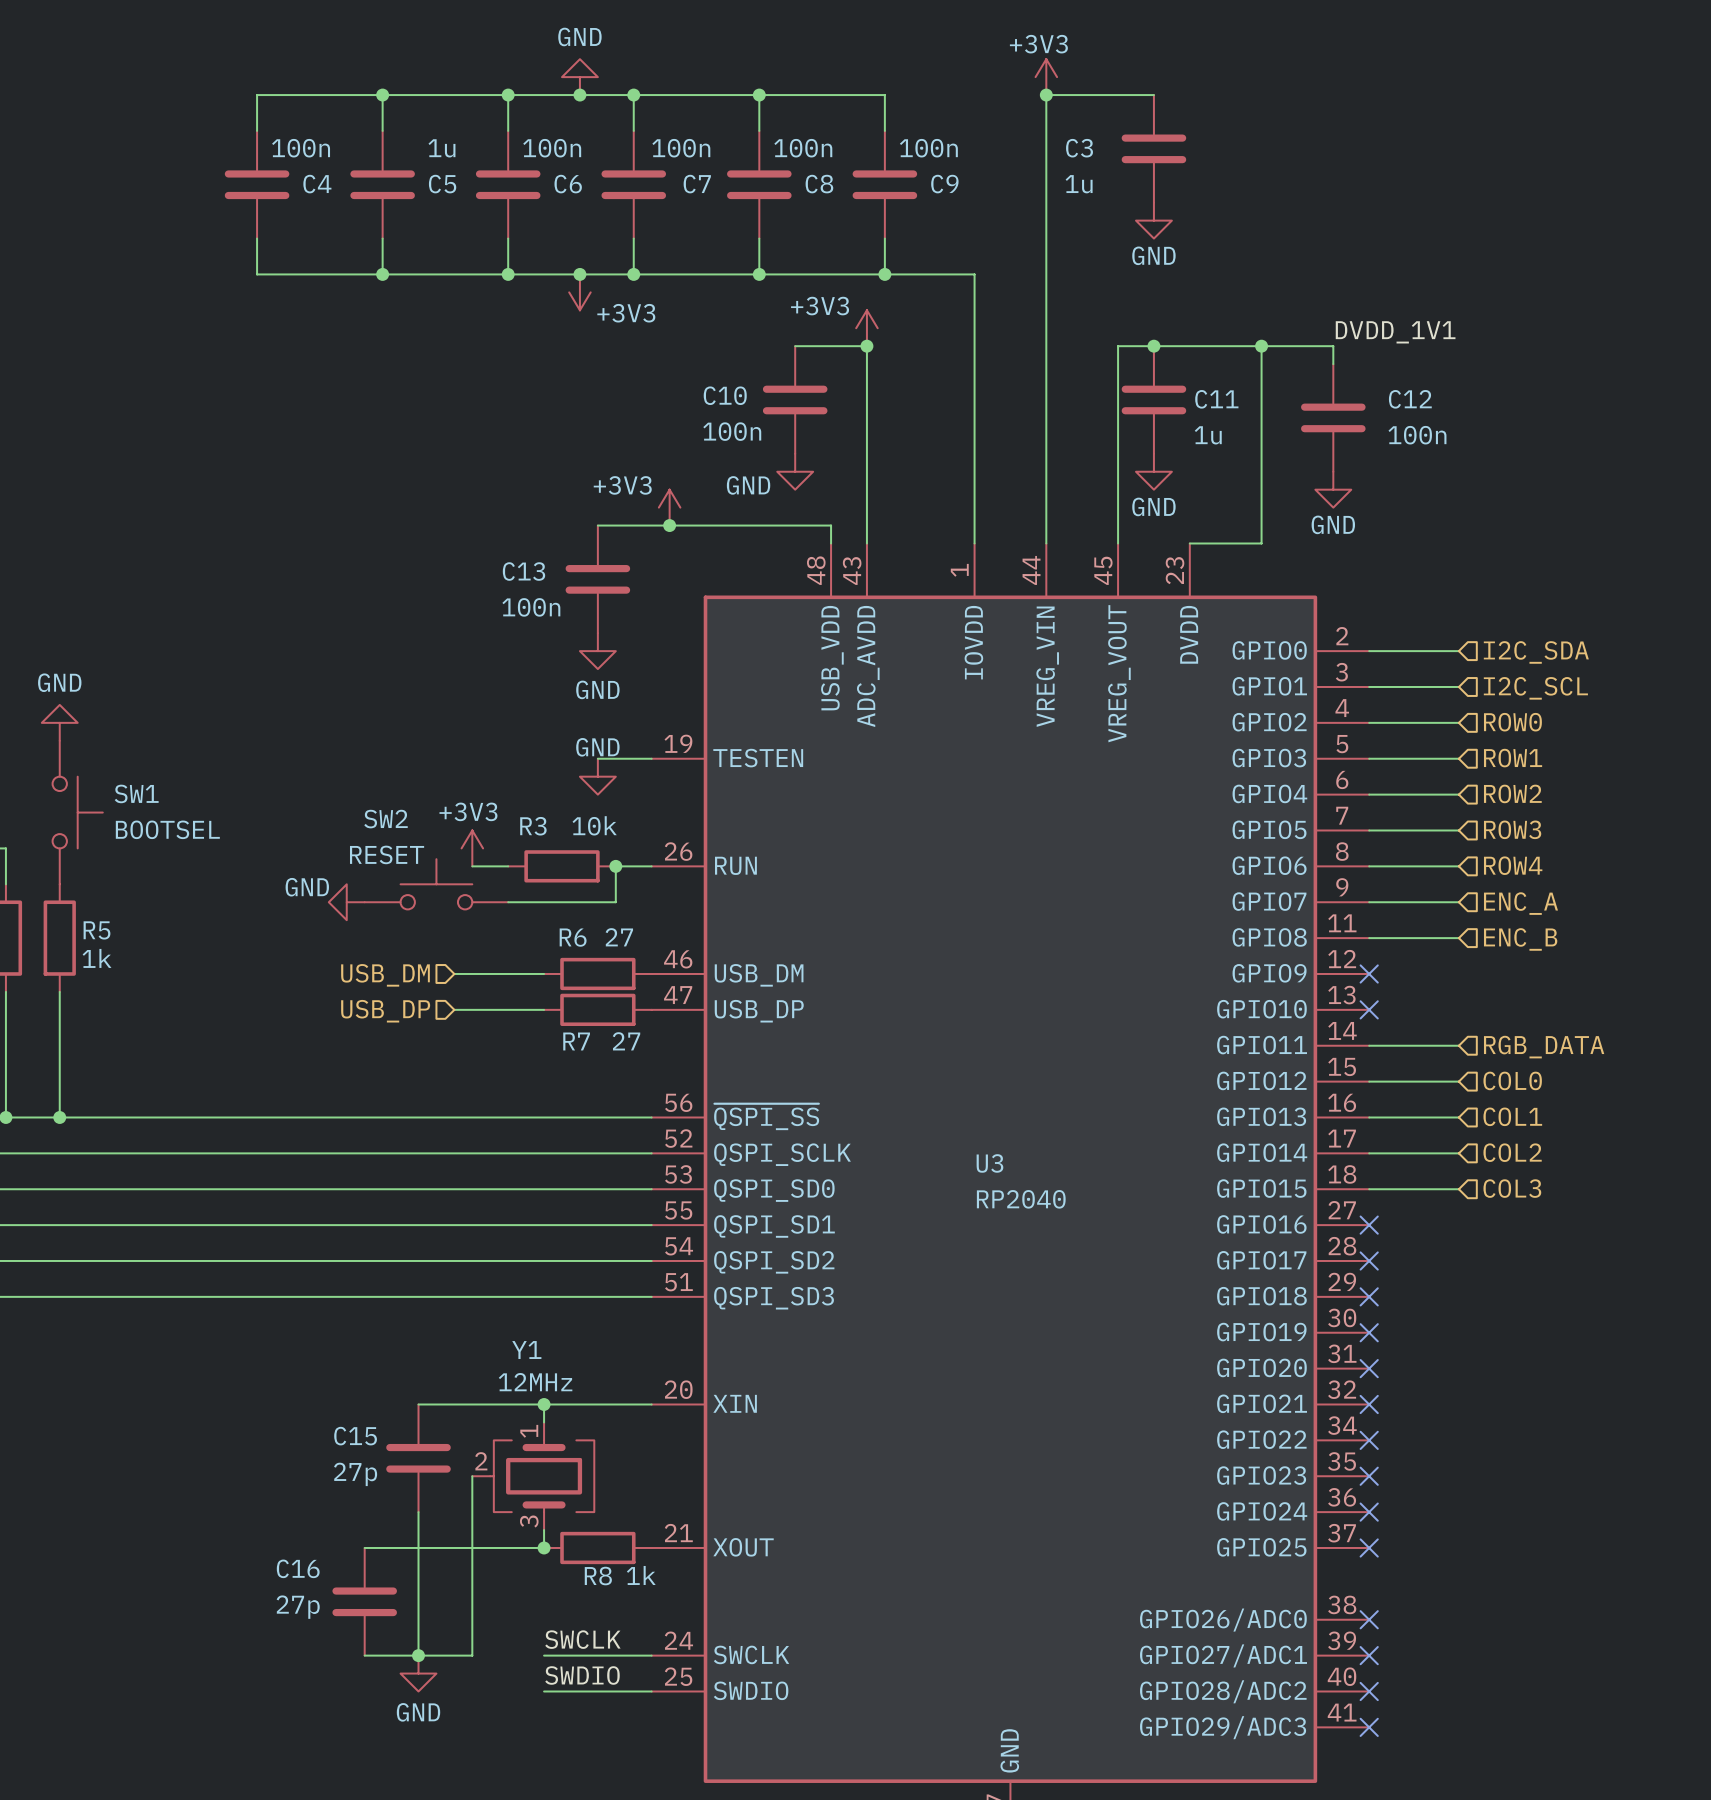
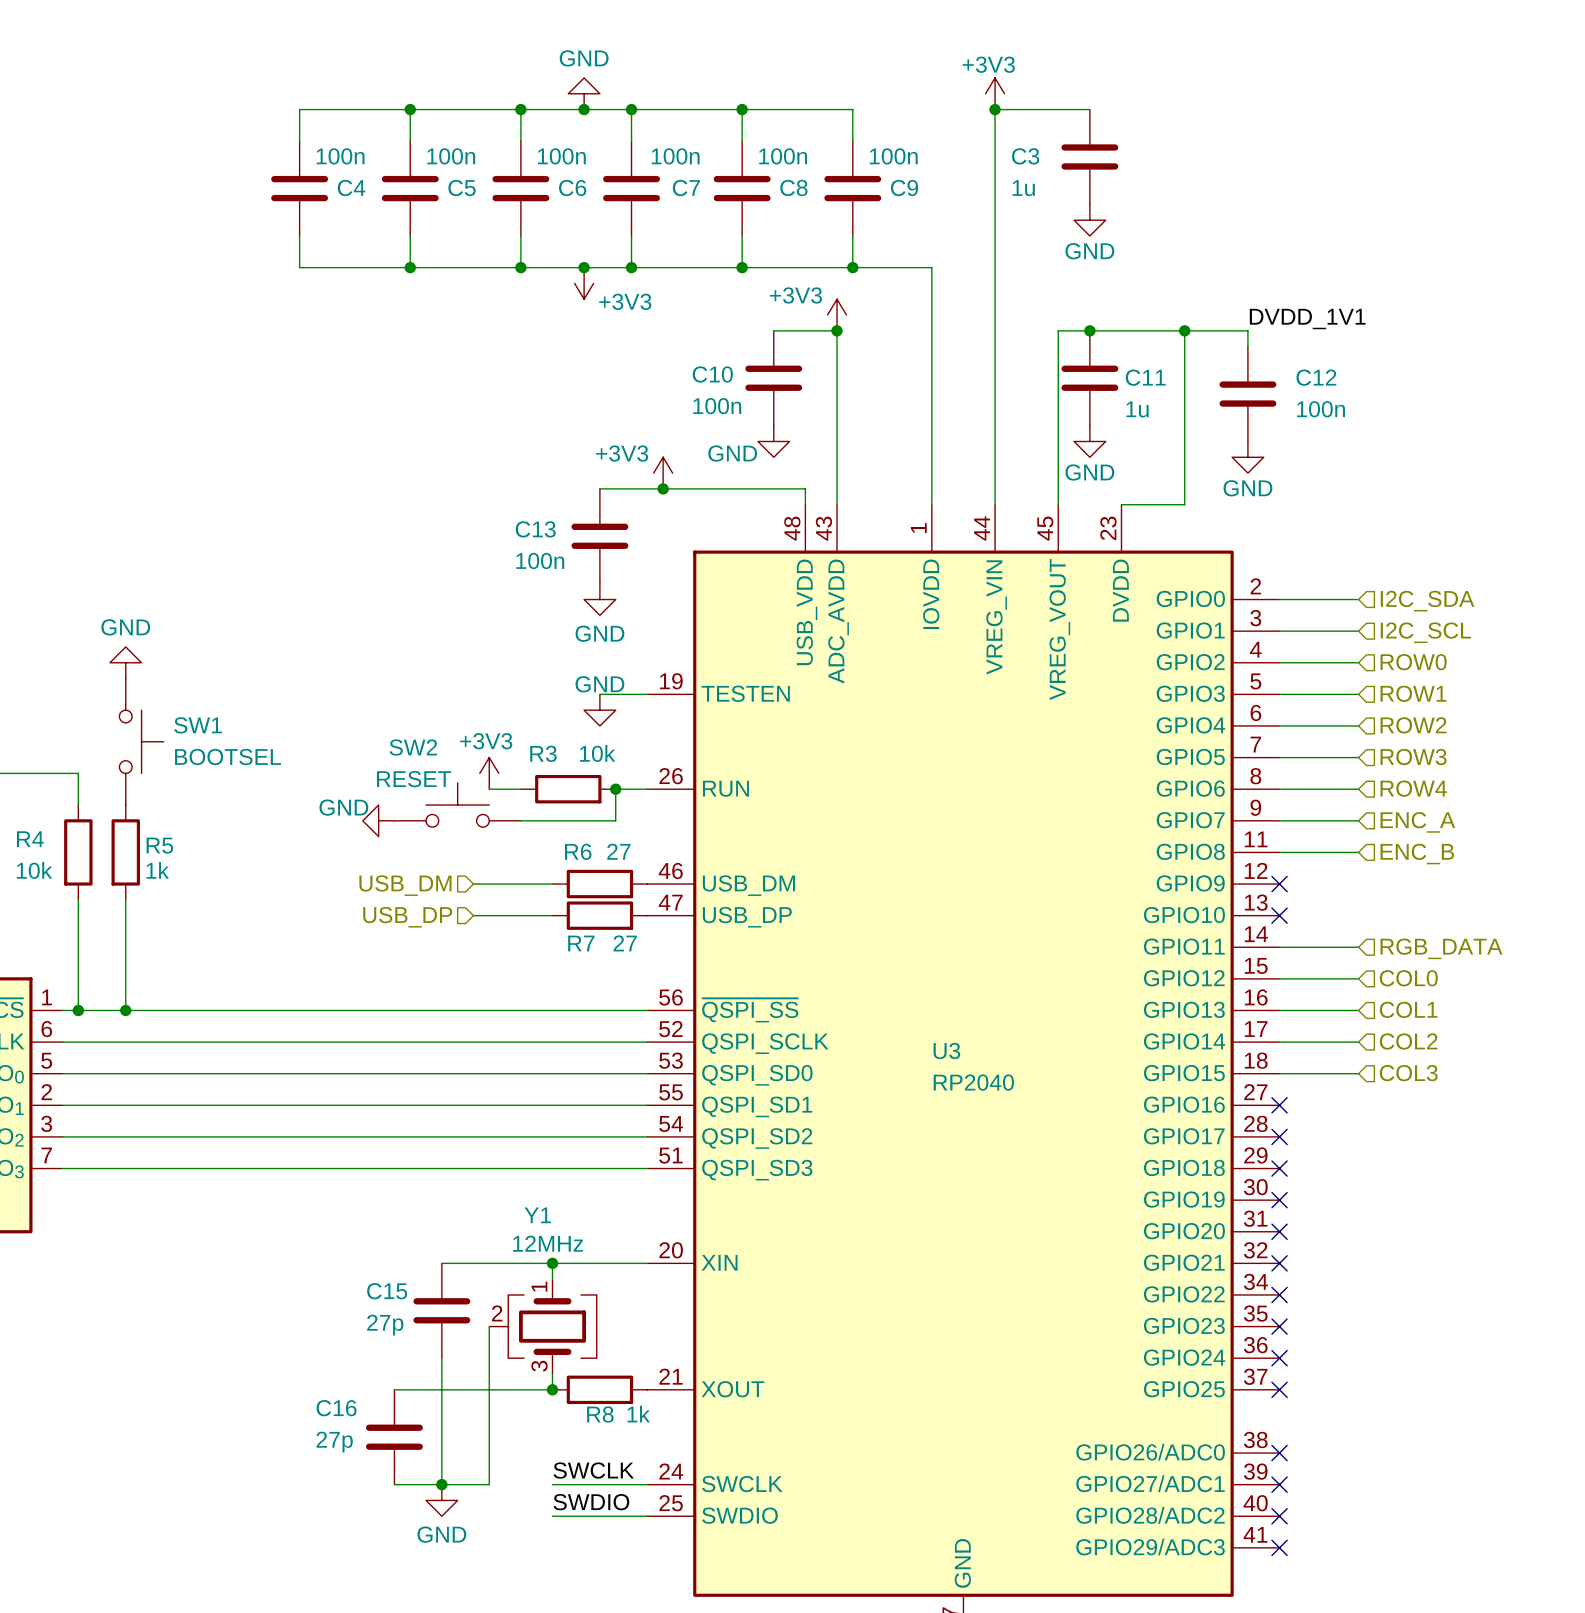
C5 value: 1u (441, 148) -> 100n (451, 156)

